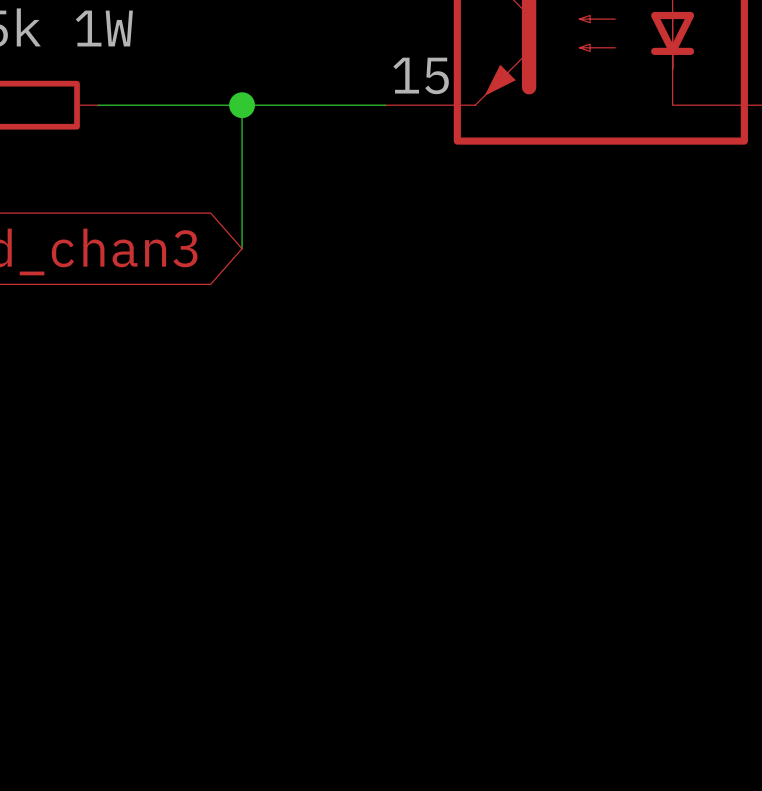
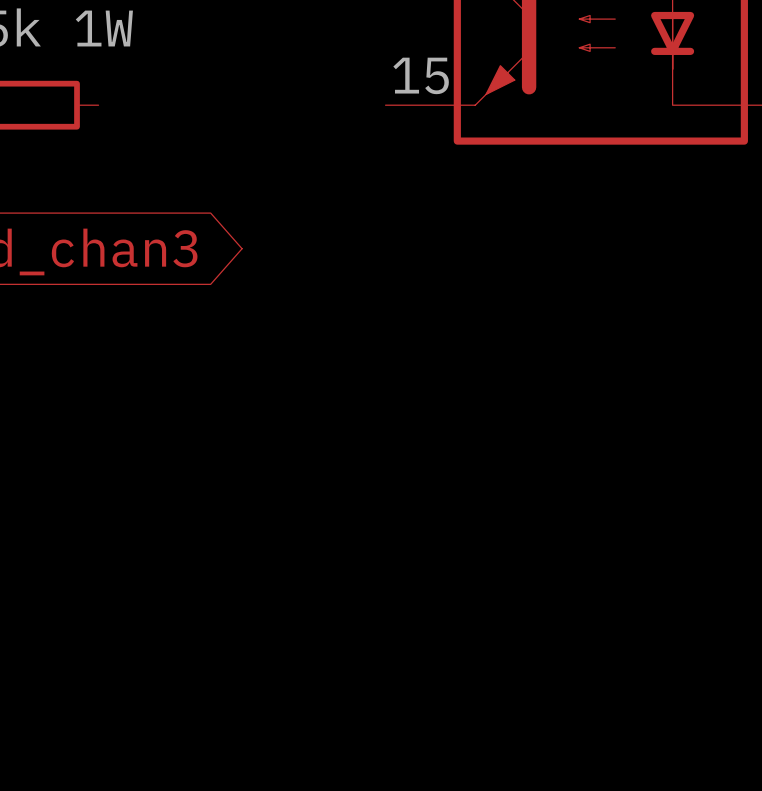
wire: (98, 105) (385, 105) -> none
wire: (242, 105) (242, 248) -> none
junction: (242, 105) -> none

